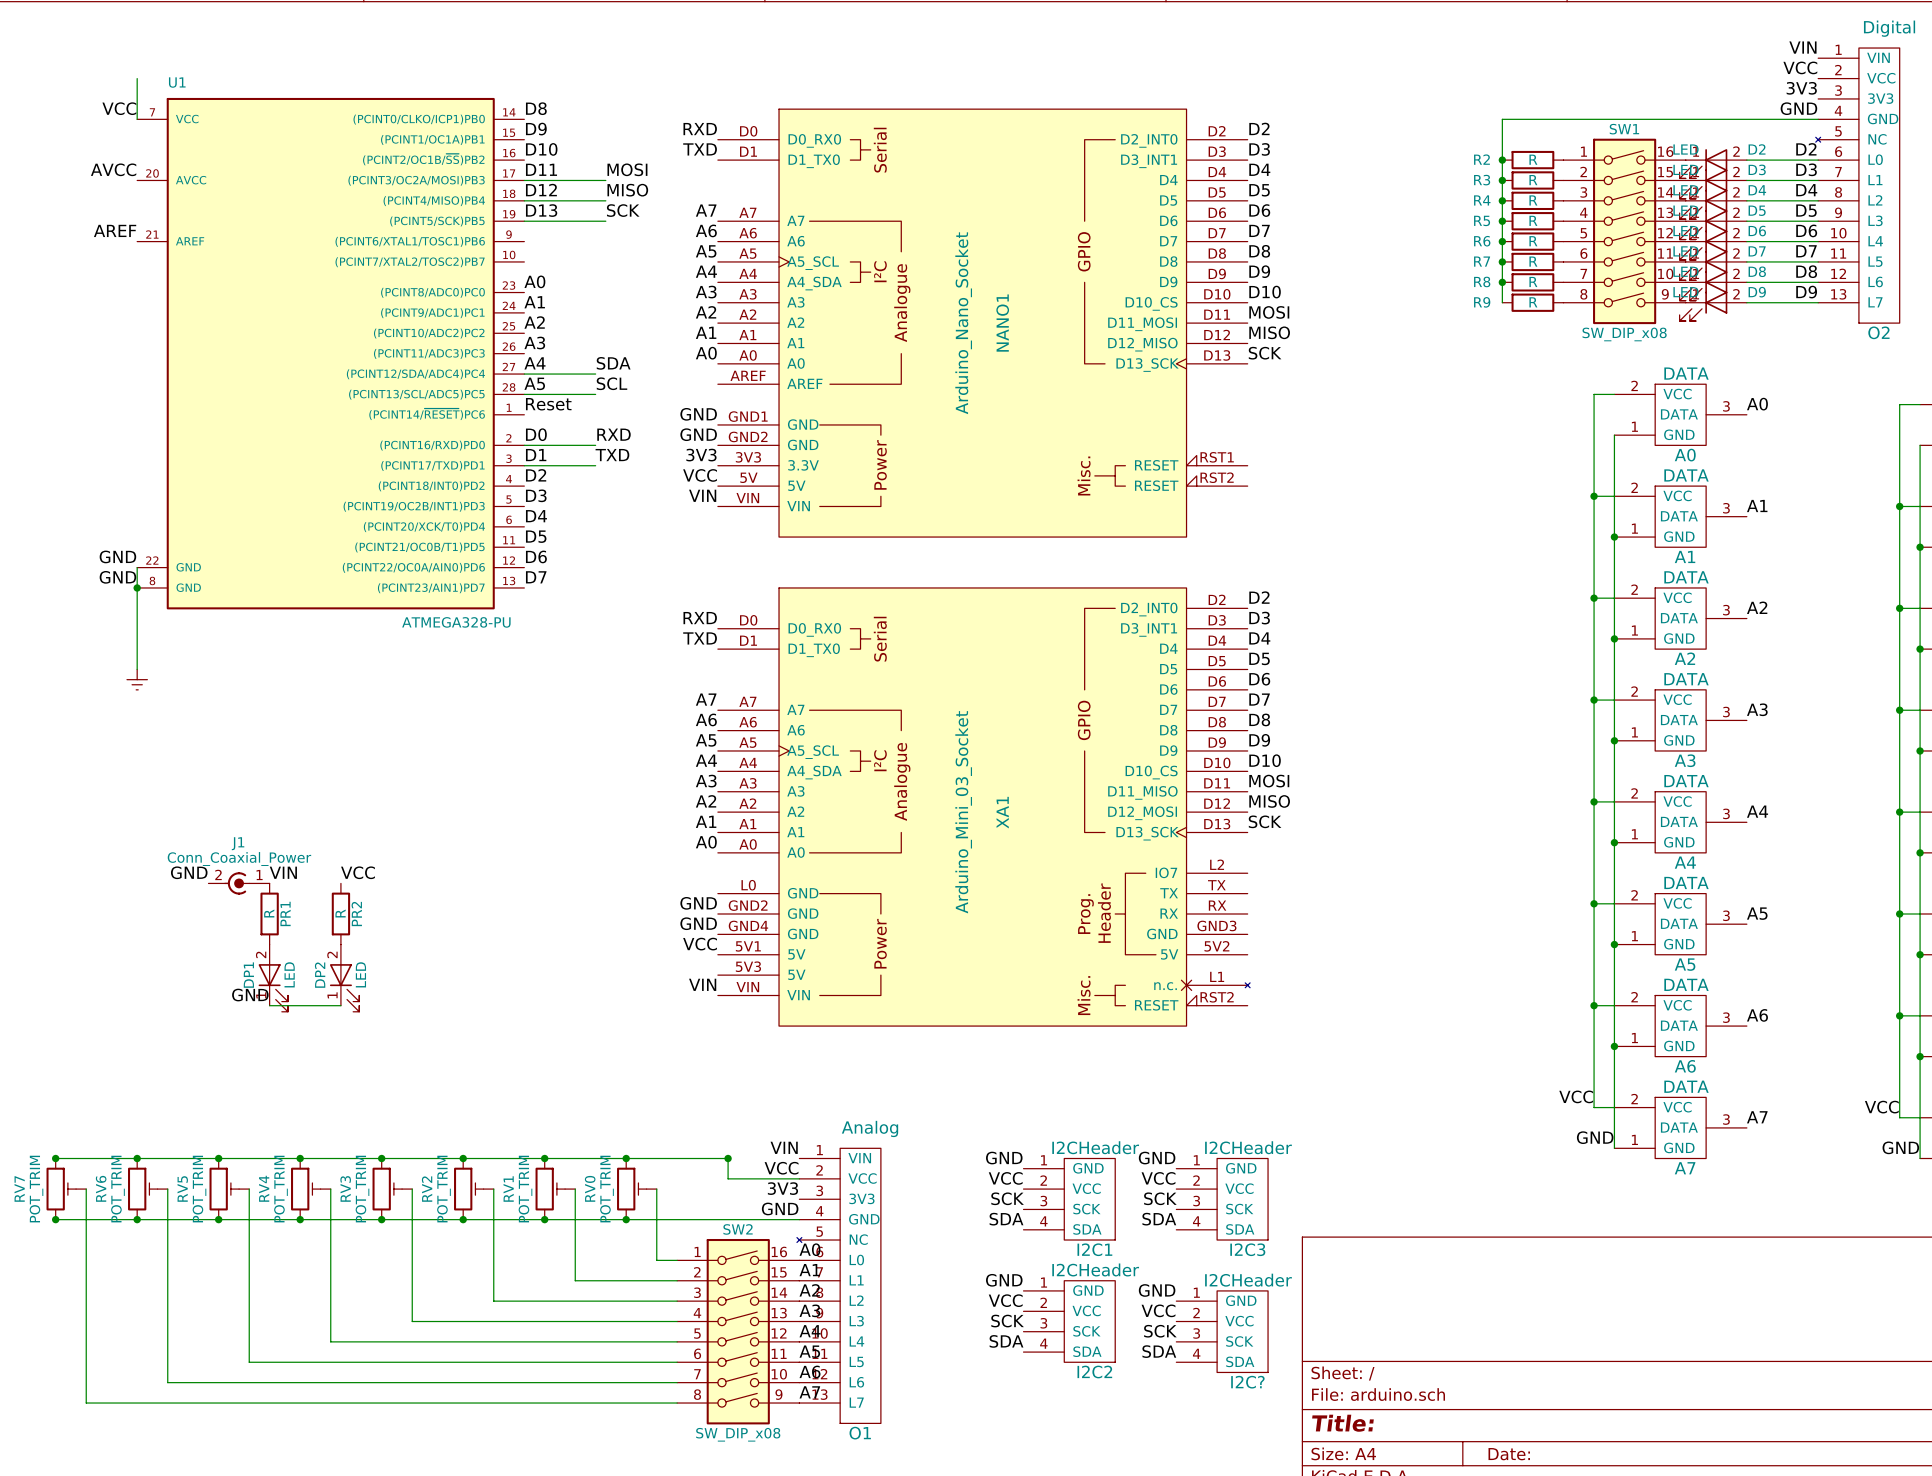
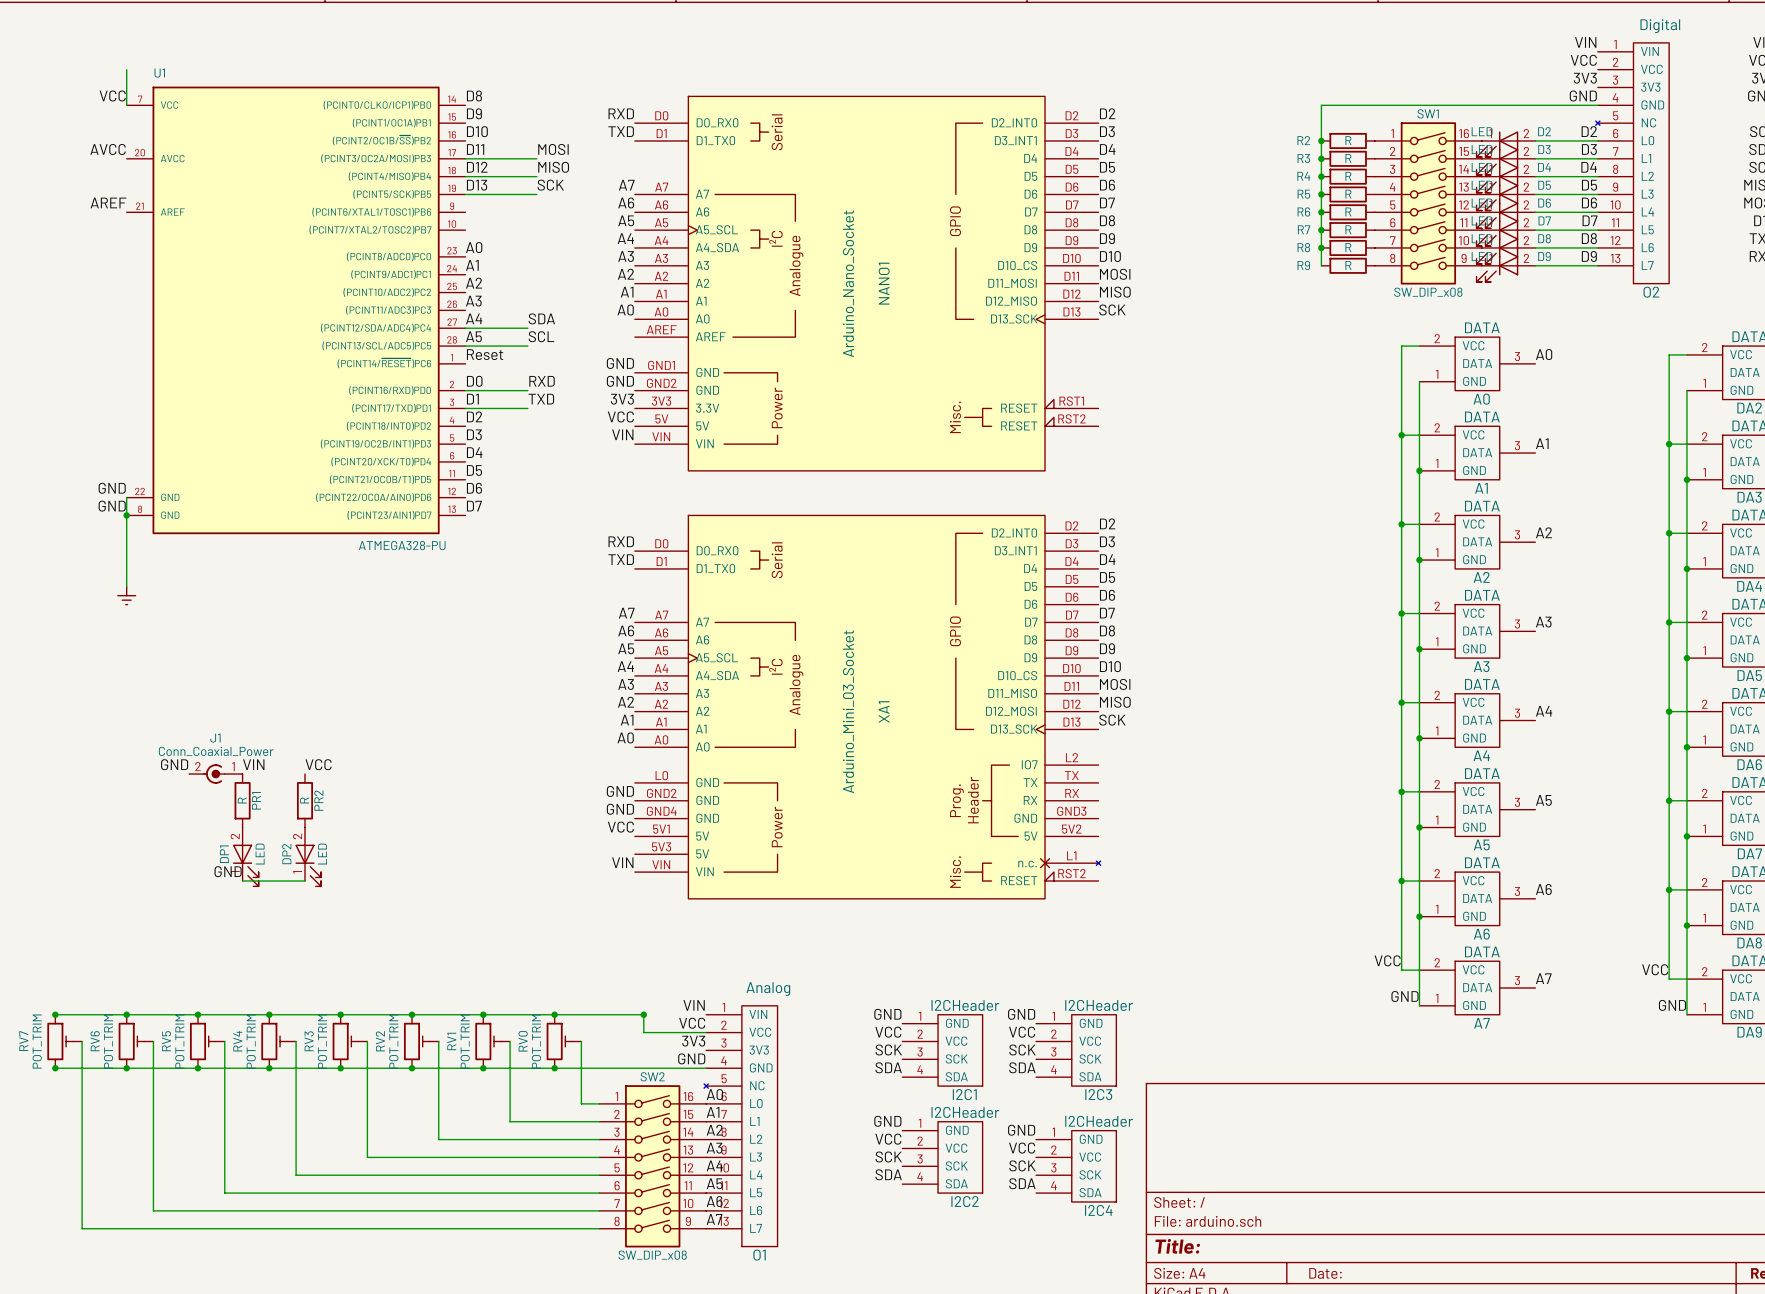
I2C? name: I2C? (1247, 1382) -> I2C4 (1098, 1210)

